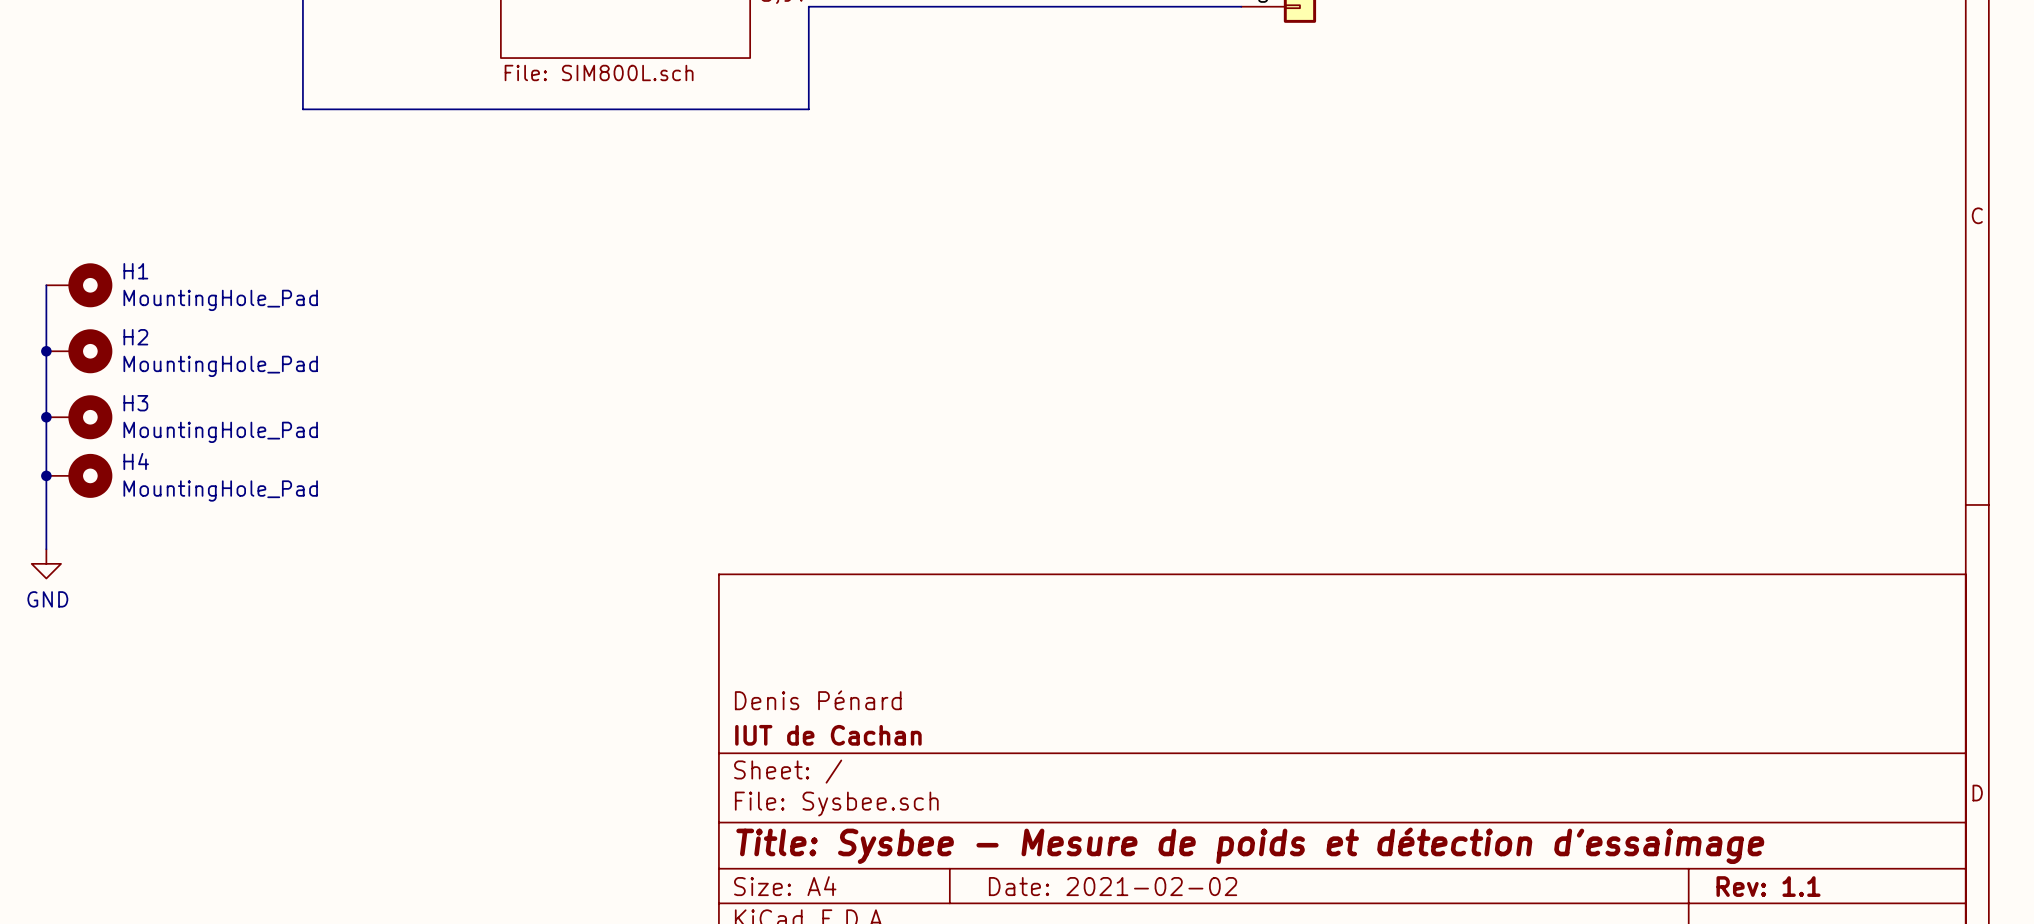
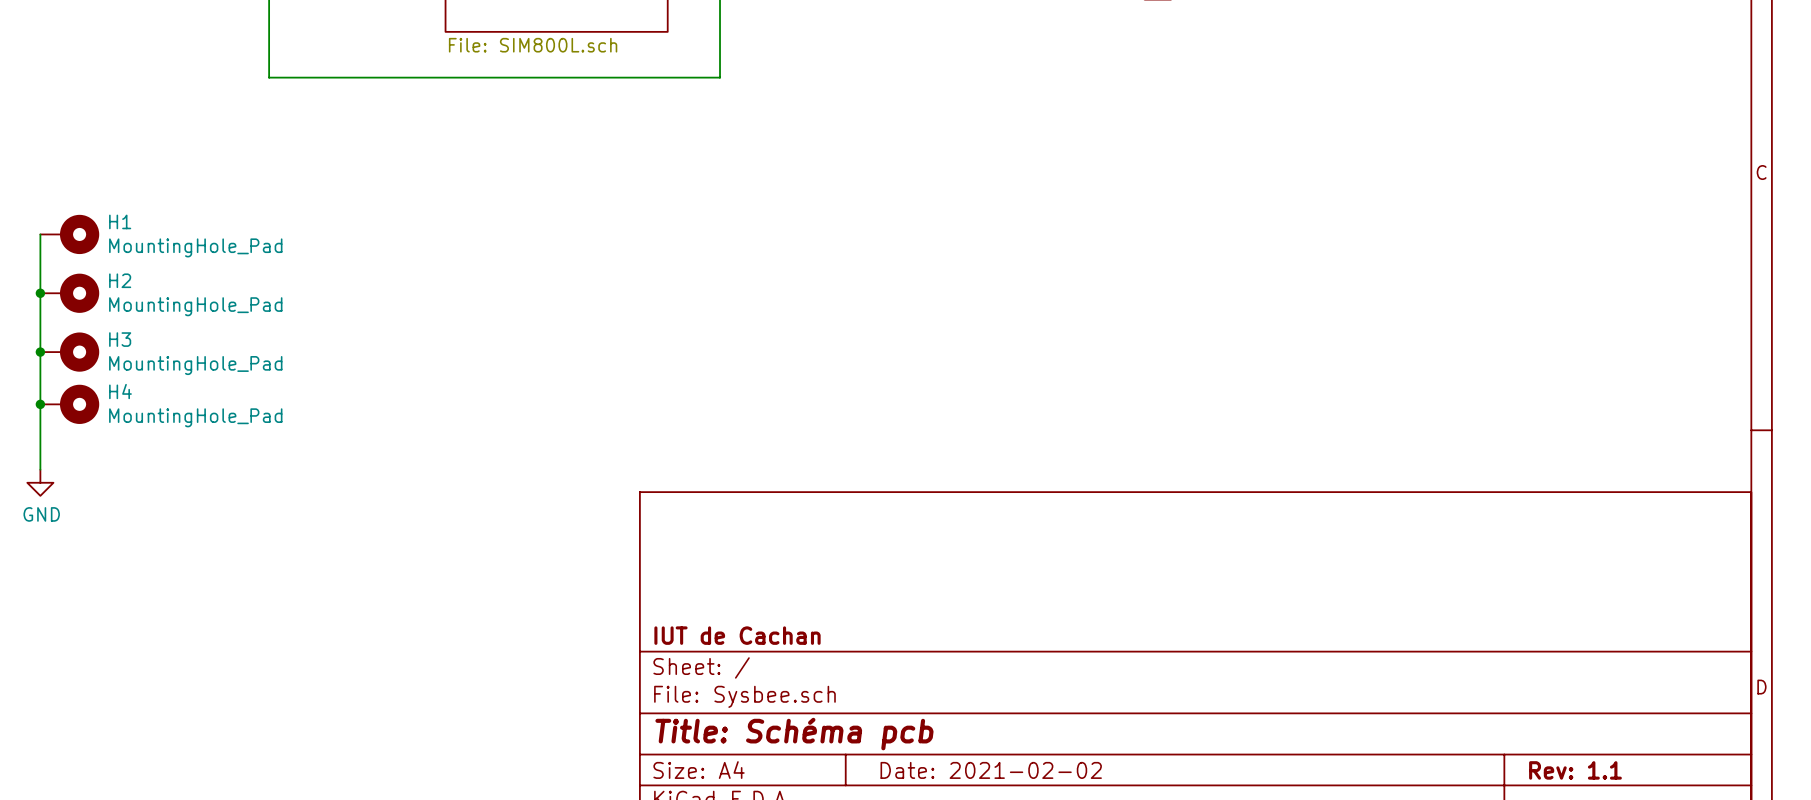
title block: Denis Pénard (818, 700) -> none
title block: Title: Sysbee - Mesure de poids et détection d'essaimage (1250, 845) -> Title: Schéma pcb (794, 734)

